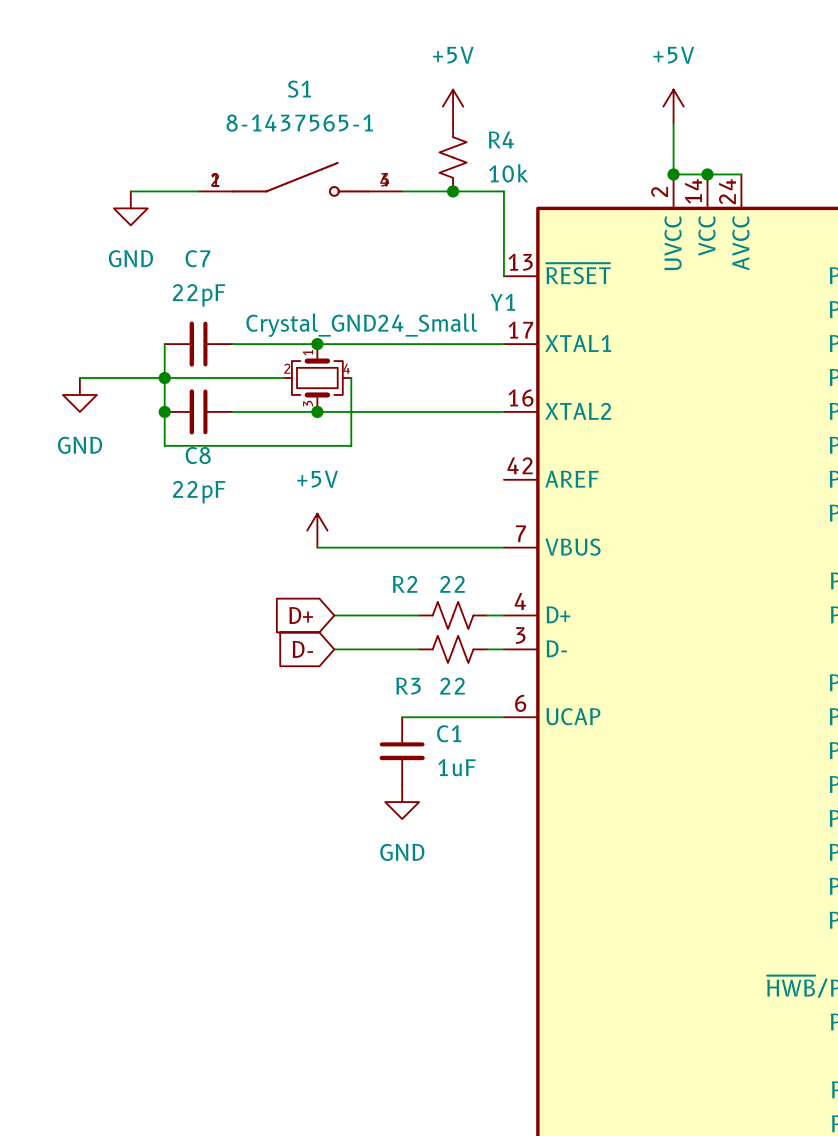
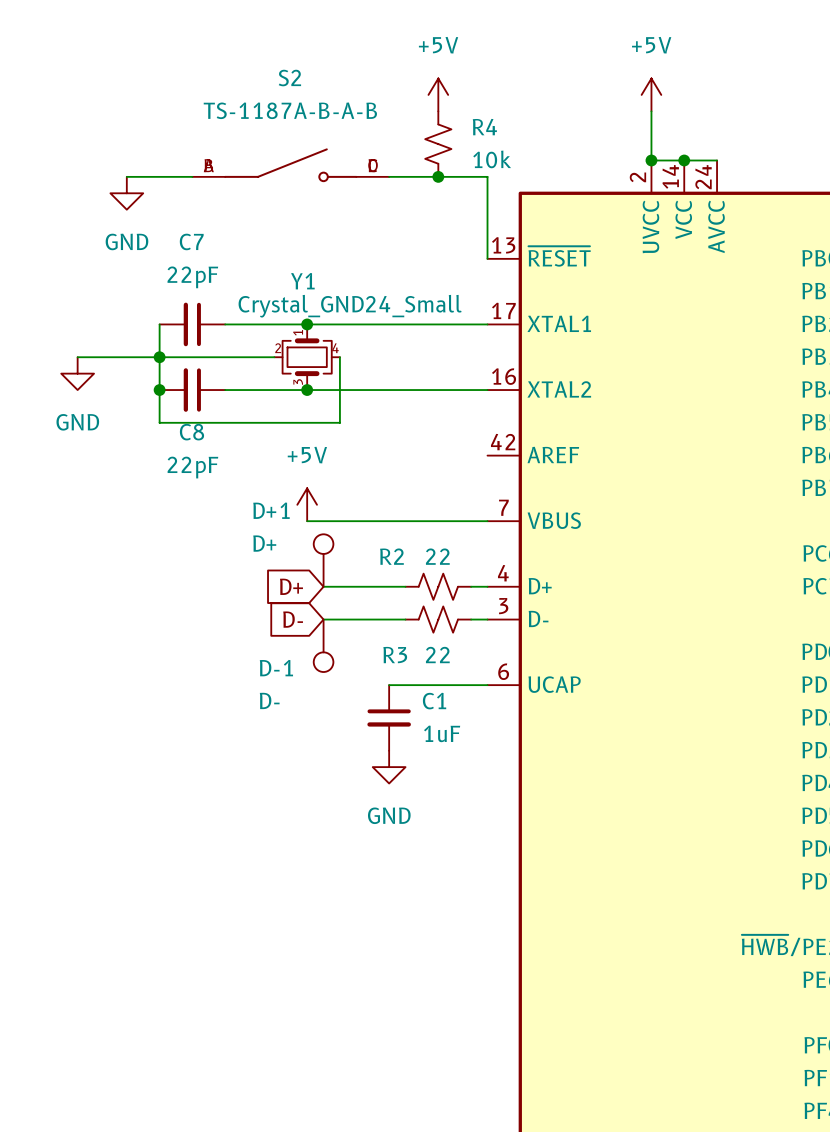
S1 name: S1 (299, 89) -> S2 (289, 78)
S1 value: 8-1437565-1 (299, 123) -> TS-1187A-B-A-B (290, 110)
S1 symbol: [198, 161, 403, 197] -> [192, 148, 390, 183]
Y1 name position: Y1 (502, 302) -> Y1 (302, 281)
D+1: none -> D+ (323, 560)
D-1: none -> D- (323, 645)

